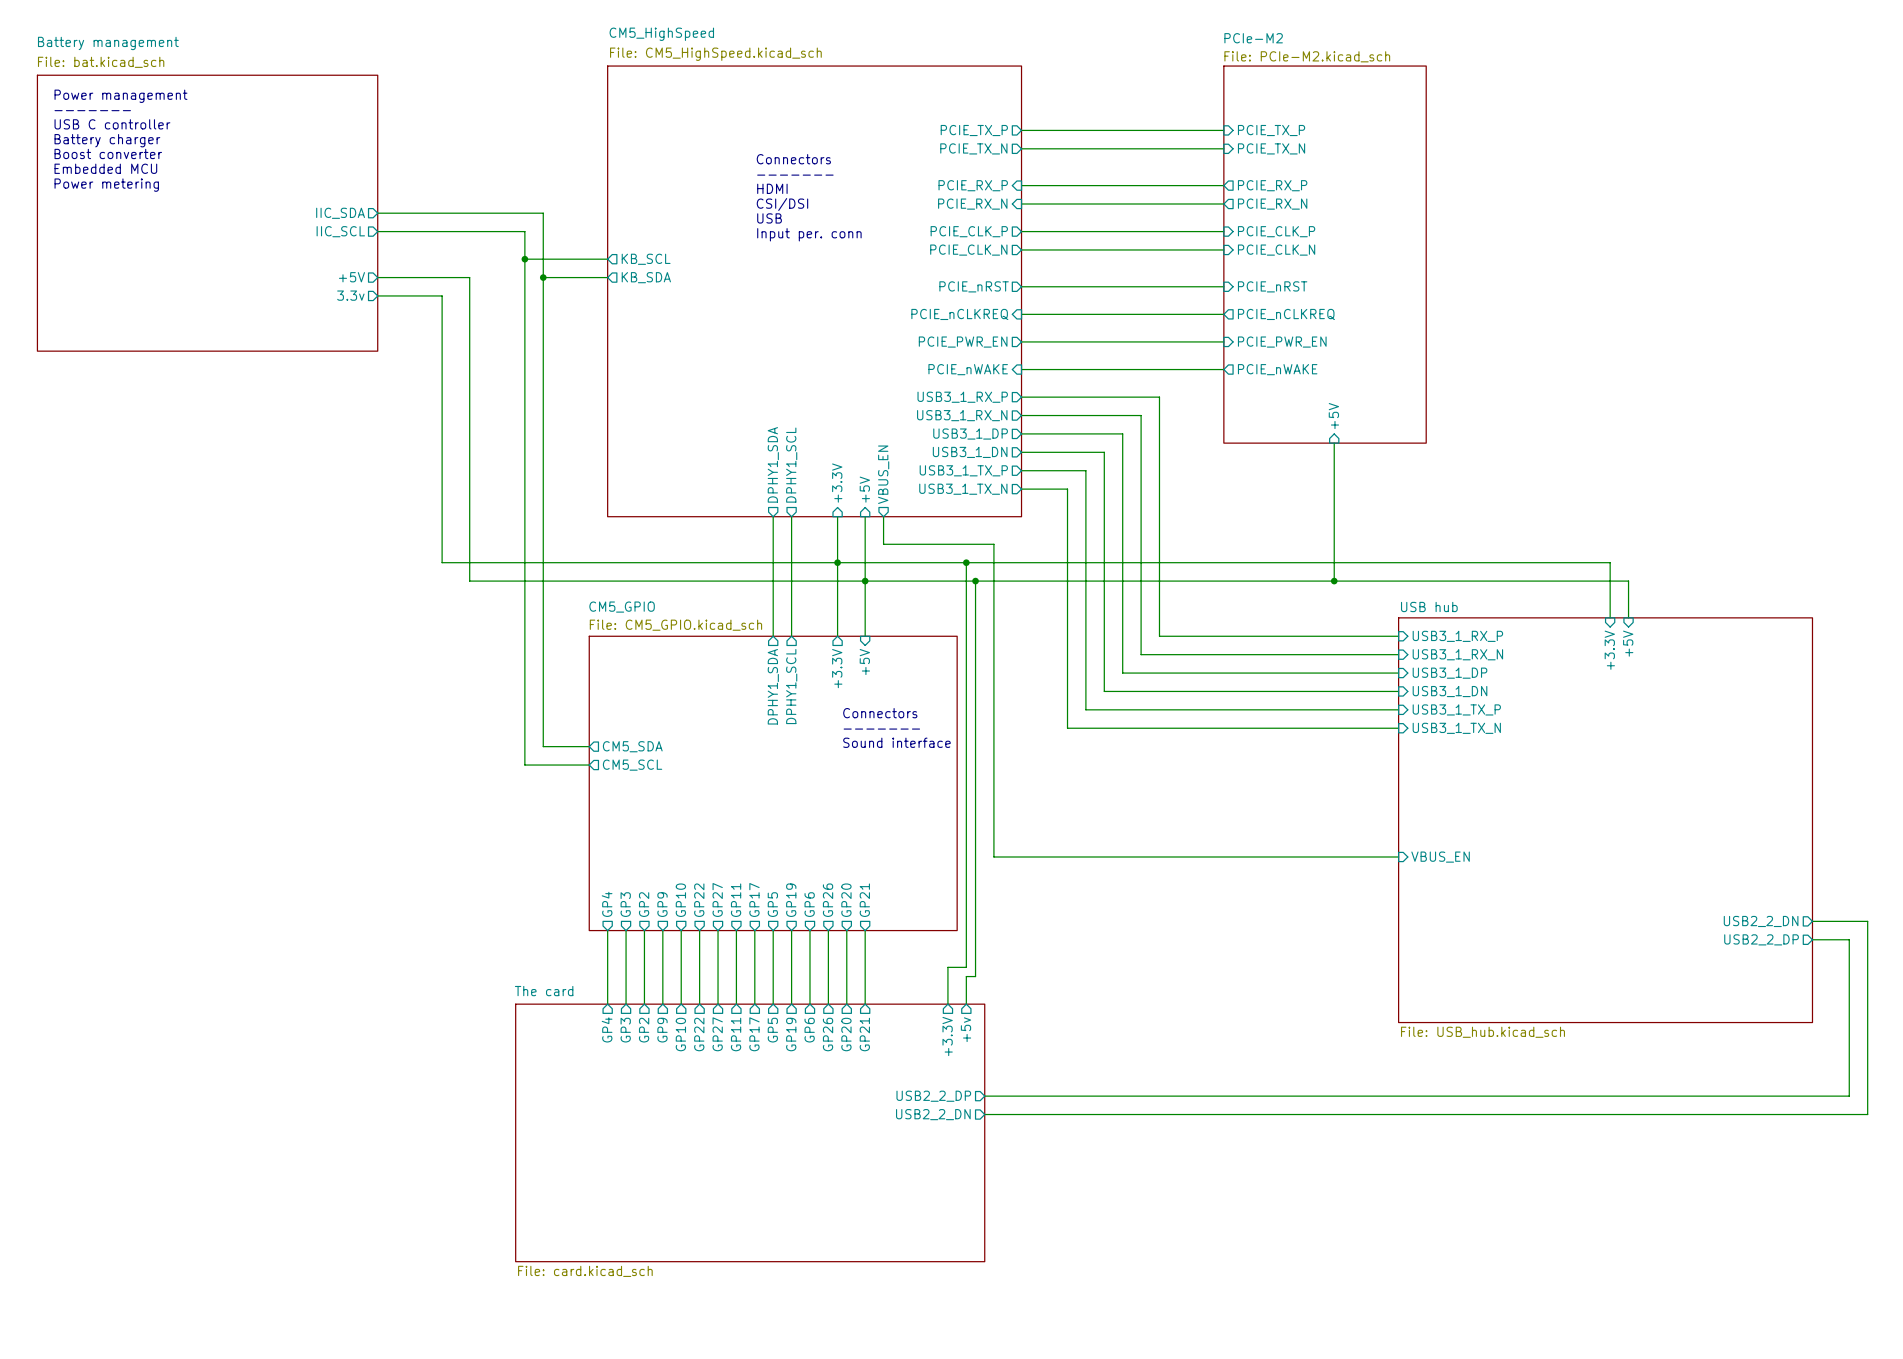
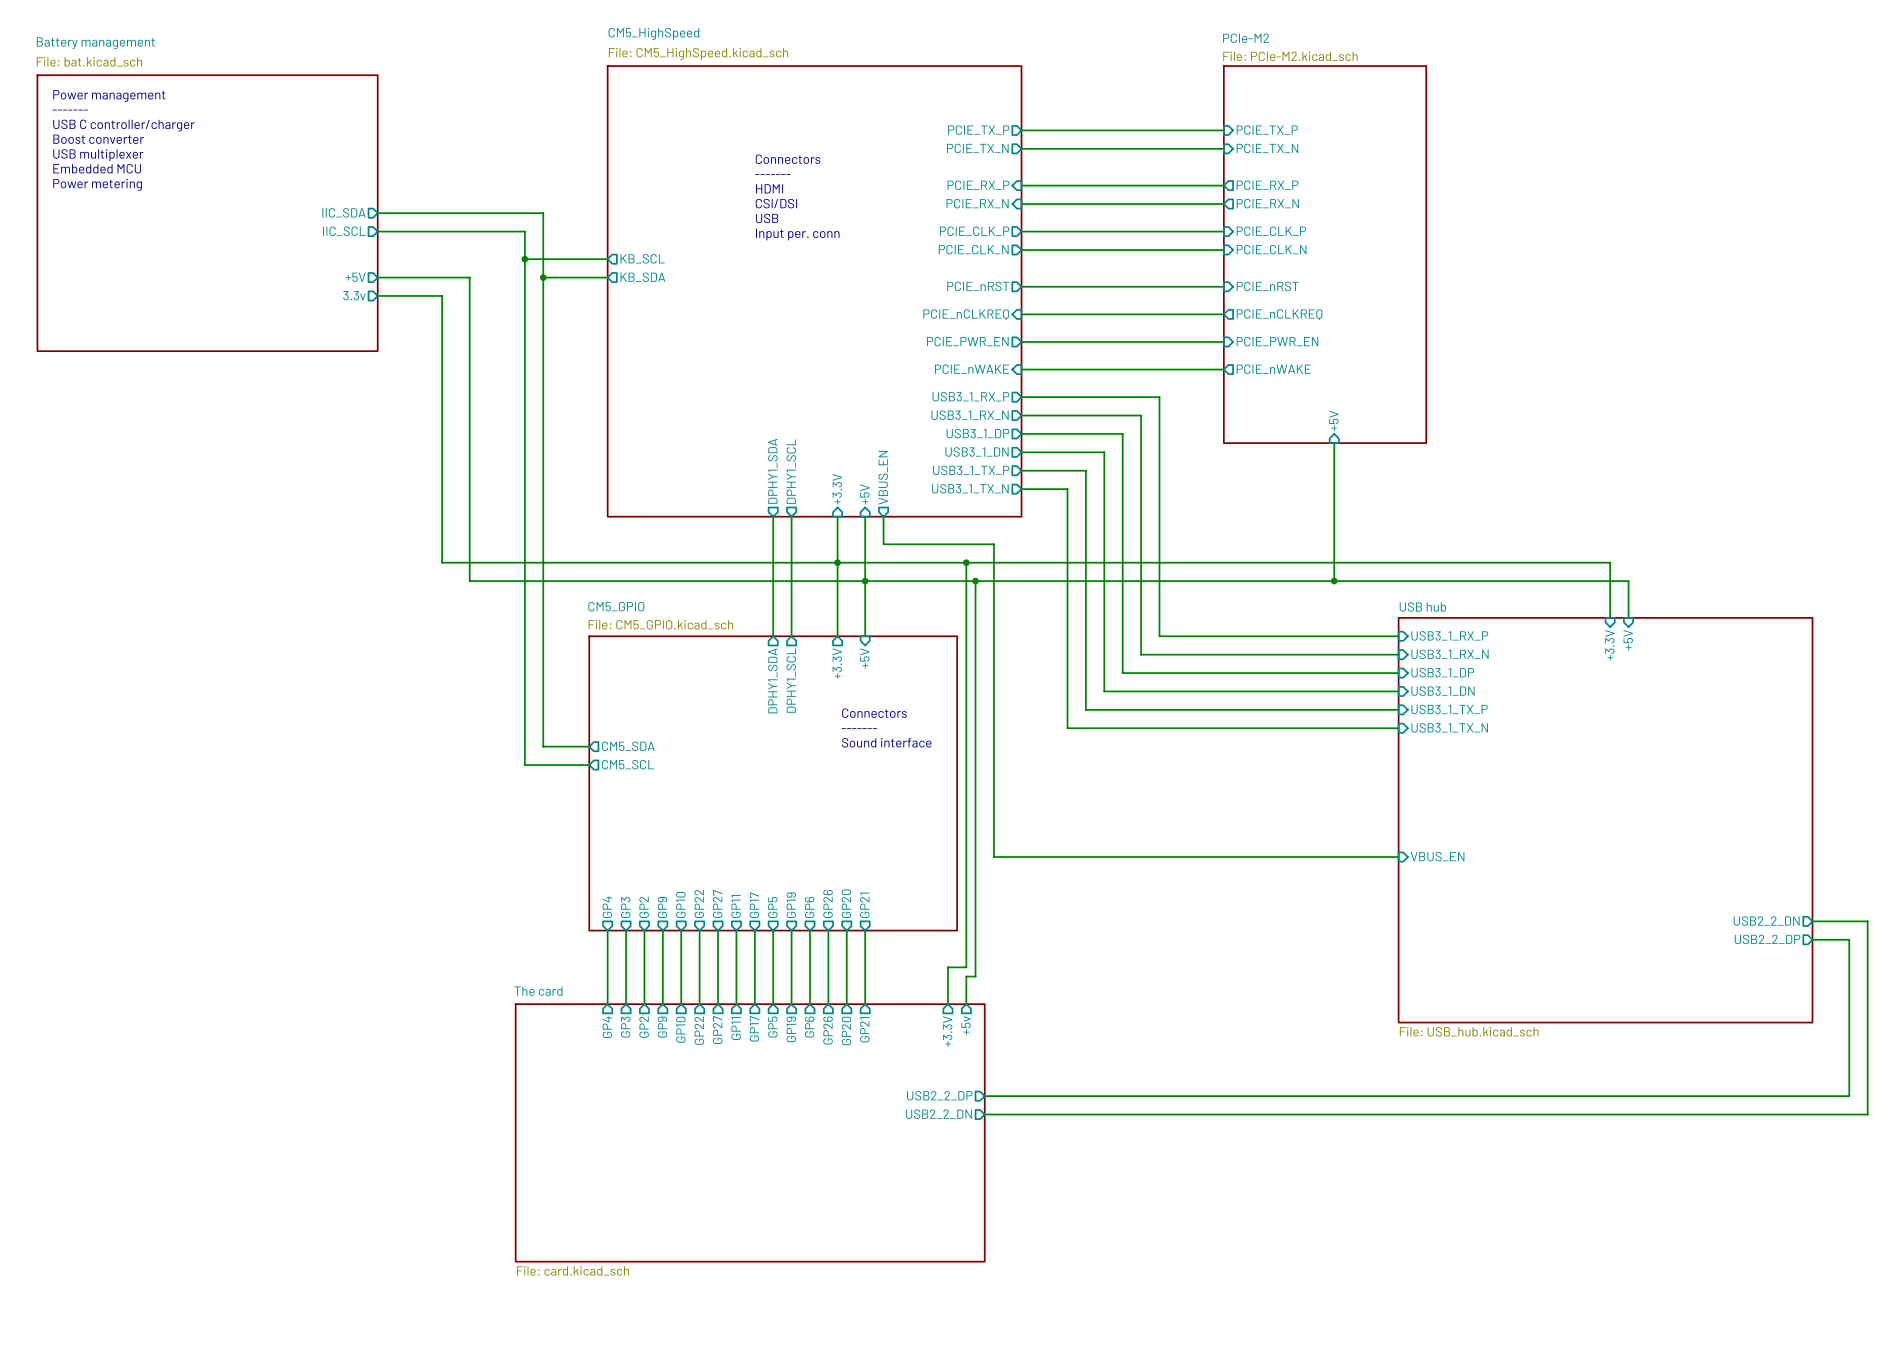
text: USB C controller (112, 124) -> USB C controller/charger (123, 125)
text: Battery charger (107, 140) -> Boost converter (98, 139)
text: Boost converter (108, 153) -> USB multiplexer (98, 155)

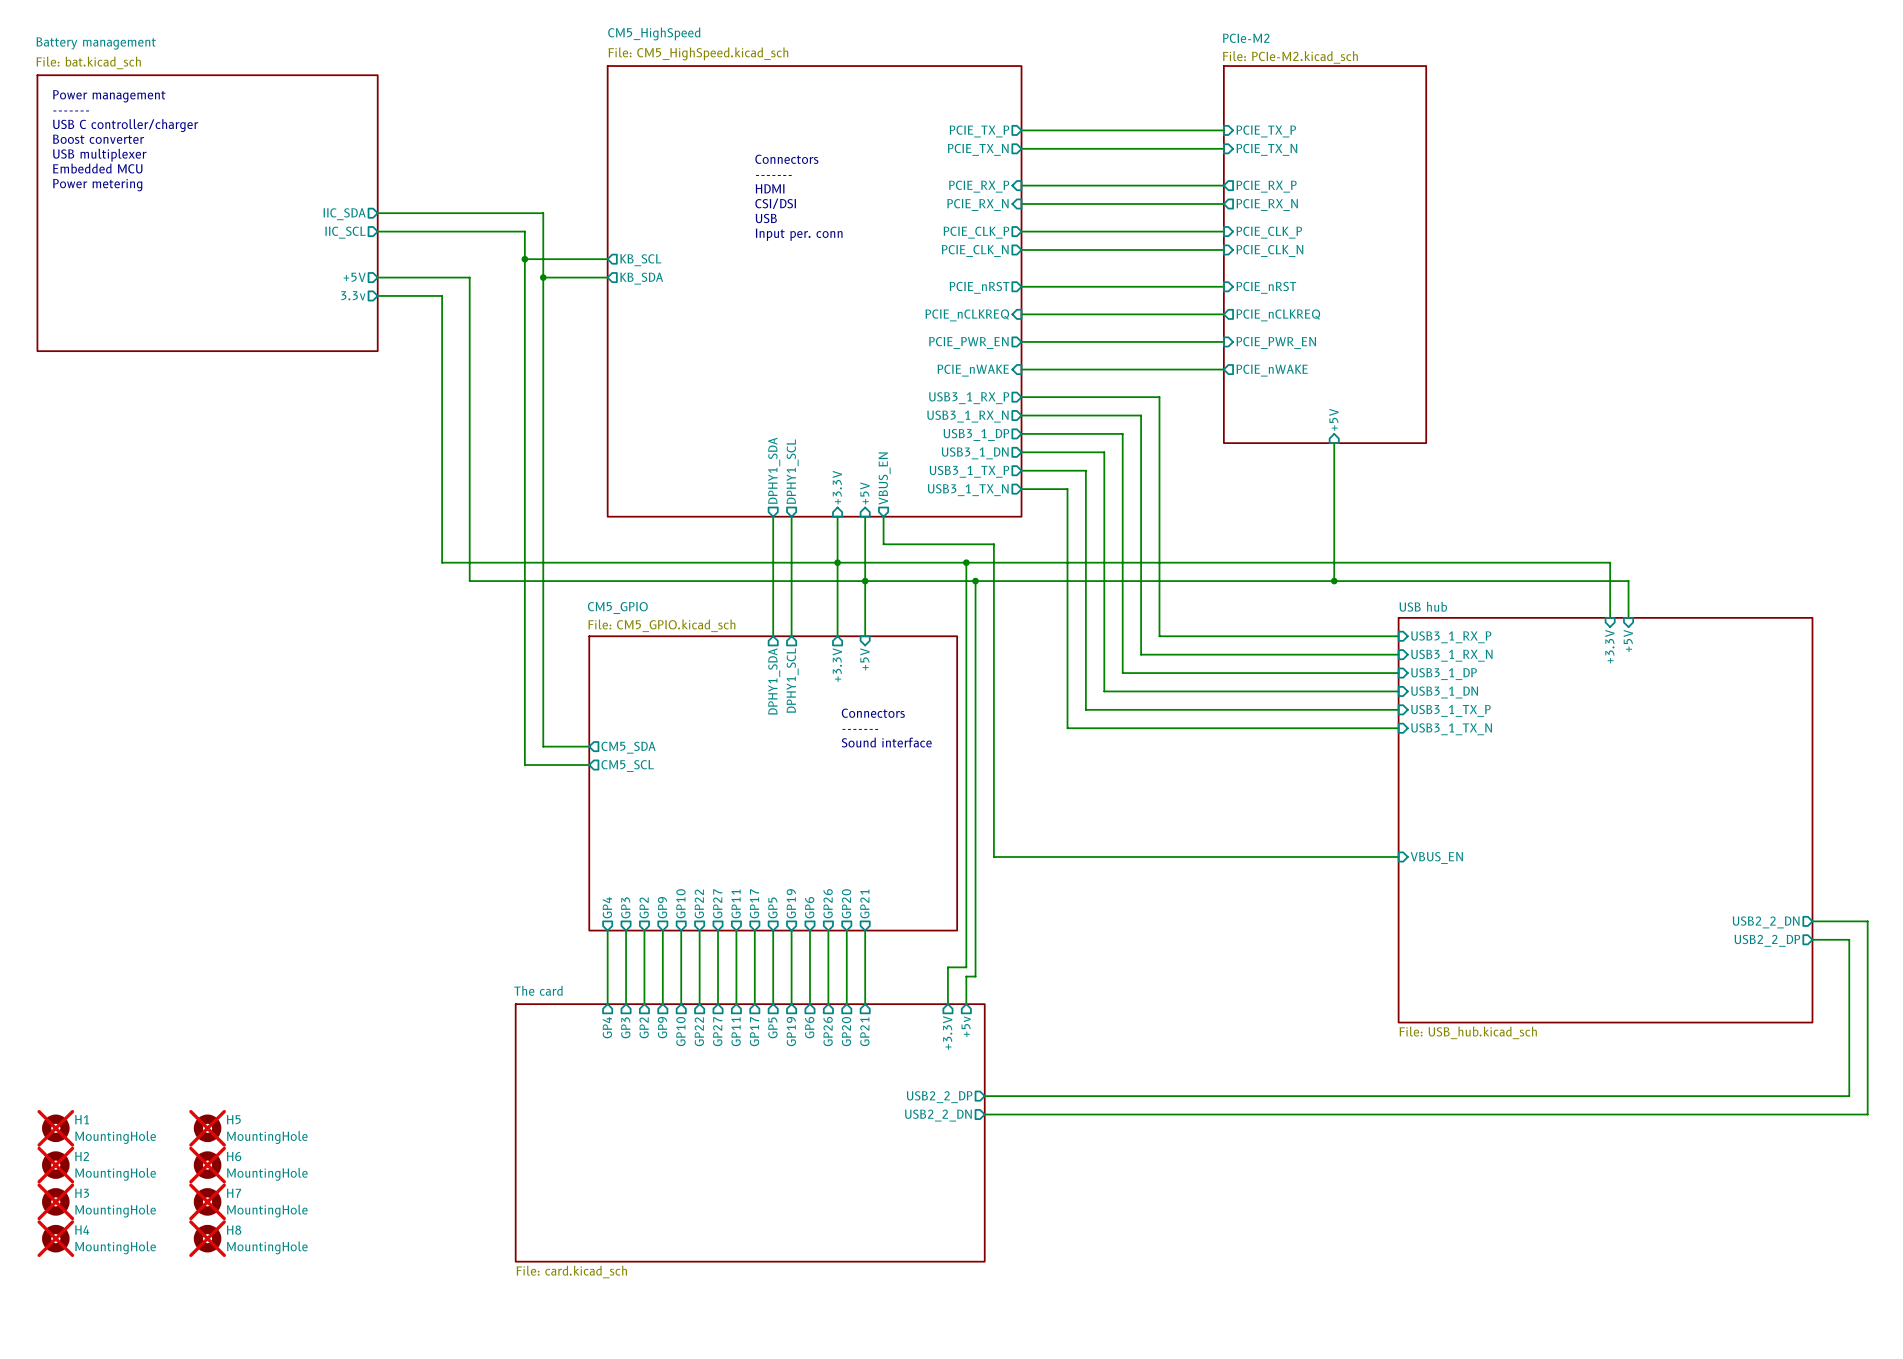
H1: none -> MountingHole (55, 1128)
H5: none -> MountingHole (207, 1128)
H2: none -> MountingHole (55, 1165)
H6: none -> MountingHole (207, 1165)
H3: none -> MountingHole (55, 1201)
H7: none -> MountingHole (207, 1201)
H4: none -> MountingHole (55, 1238)
H8: none -> MountingHole (207, 1238)

